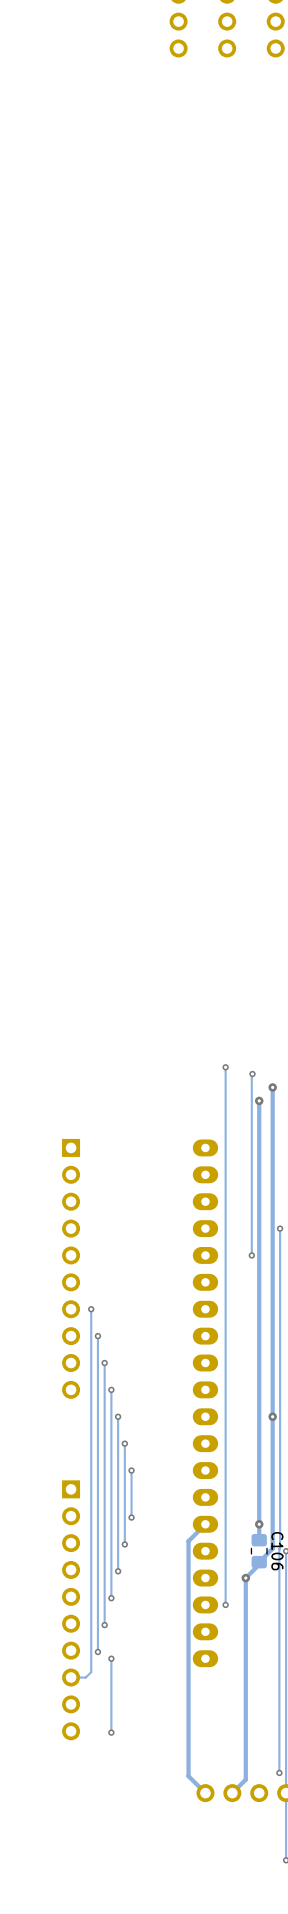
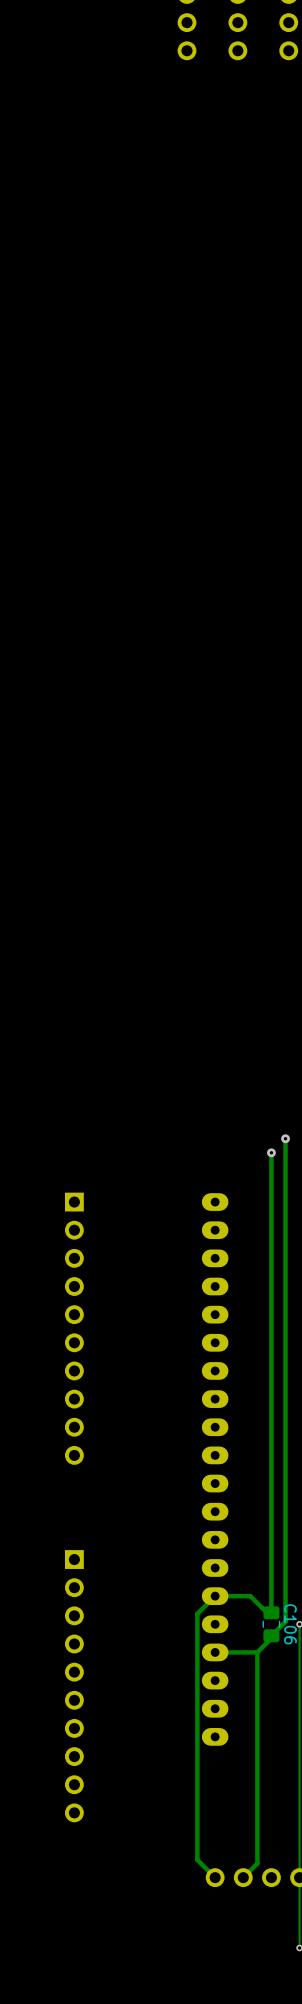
track: (225, 1067) (225, 1604) -> none
via: (225, 1067) -> none
track: (252, 1074) (251, 1255) -> none
via: (252, 1074) -> none
track: (280, 1228) (279, 1772) -> none
via: (280, 1228) -> none
via: (251, 1255) -> none
track: (91, 1309) (91, 1672) (85, 1677) (71, 1677) -> none
via: (91, 1309) -> none
track: (97, 1336) (97, 1651) -> none
via: (97, 1336) -> none
track: (104, 1363) (104, 1625) -> none
via: (104, 1363) -> none
track: (111, 1389) (111, 1598) -> none
via: (111, 1389) -> none
track: (118, 1416) (118, 1571) -> none
via: (118, 1416) -> none
via: (272, 1416) -> none
track: (124, 1443) (124, 1544) -> none
via: (124, 1443) -> none
track: (131, 1470) (131, 1517) -> none
via: (131, 1470) -> none
via: (131, 1517) -> none
track: none -> (215, 1596) (250, 1596) (266, 1612)
via: (259, 1524) -> none
via: (124, 1544) -> none
via: (118, 1571) -> none
track: none -> (257, 1652) (215, 1652)
via: (245, 1578) -> none
via: (111, 1598) -> none
via: (225, 1604) -> none
via: (104, 1625) -> none
via: (97, 1651) -> none
track: (111, 1658) (111, 1732) -> none
via: (111, 1658) -> none
via: (111, 1732) -> none
via: (279, 1772) -> none

